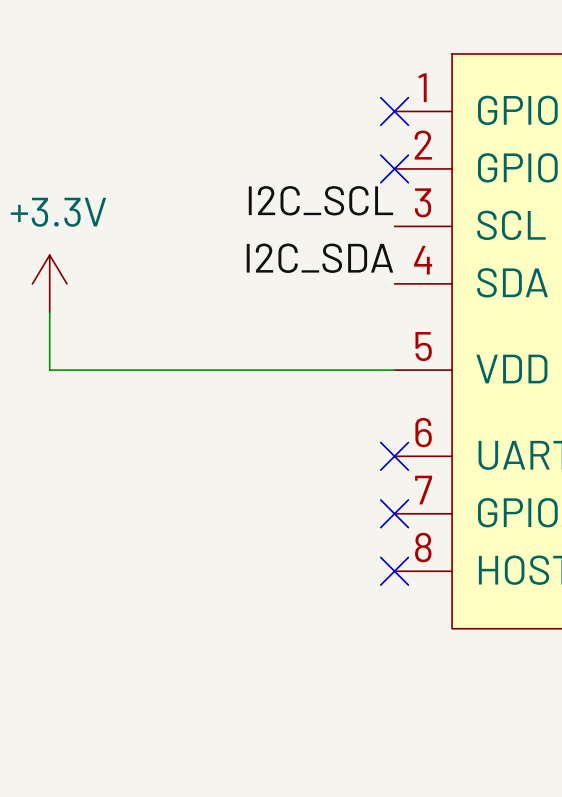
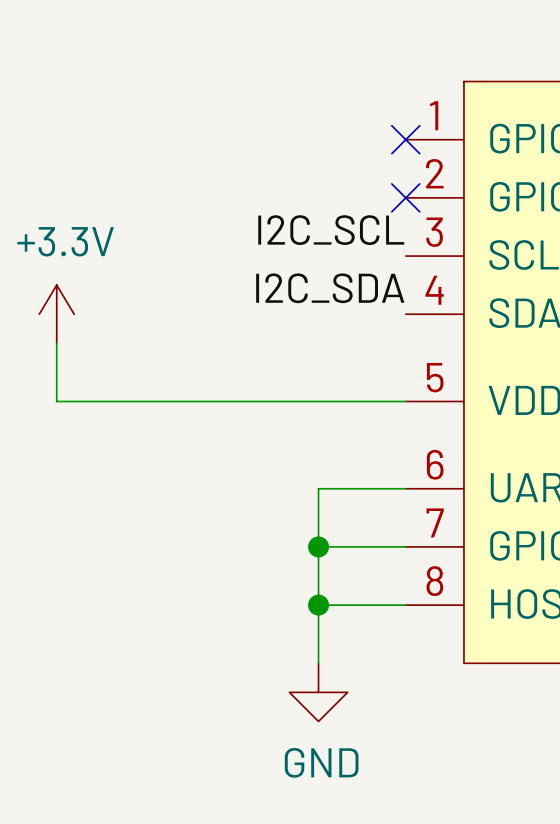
wire: none -> (405, 488) (318, 488) (318, 663)
no-connect mark: (394, 456) -> none
wire: none -> (318, 546) (405, 546)
junction: none -> (318, 546)
no-connect mark: (394, 513) -> none
wire: none -> (318, 605) (405, 605)
junction: none -> (318, 605)
no-connect mark: (394, 571) -> none
power symbol: none -> GND (318, 692)

